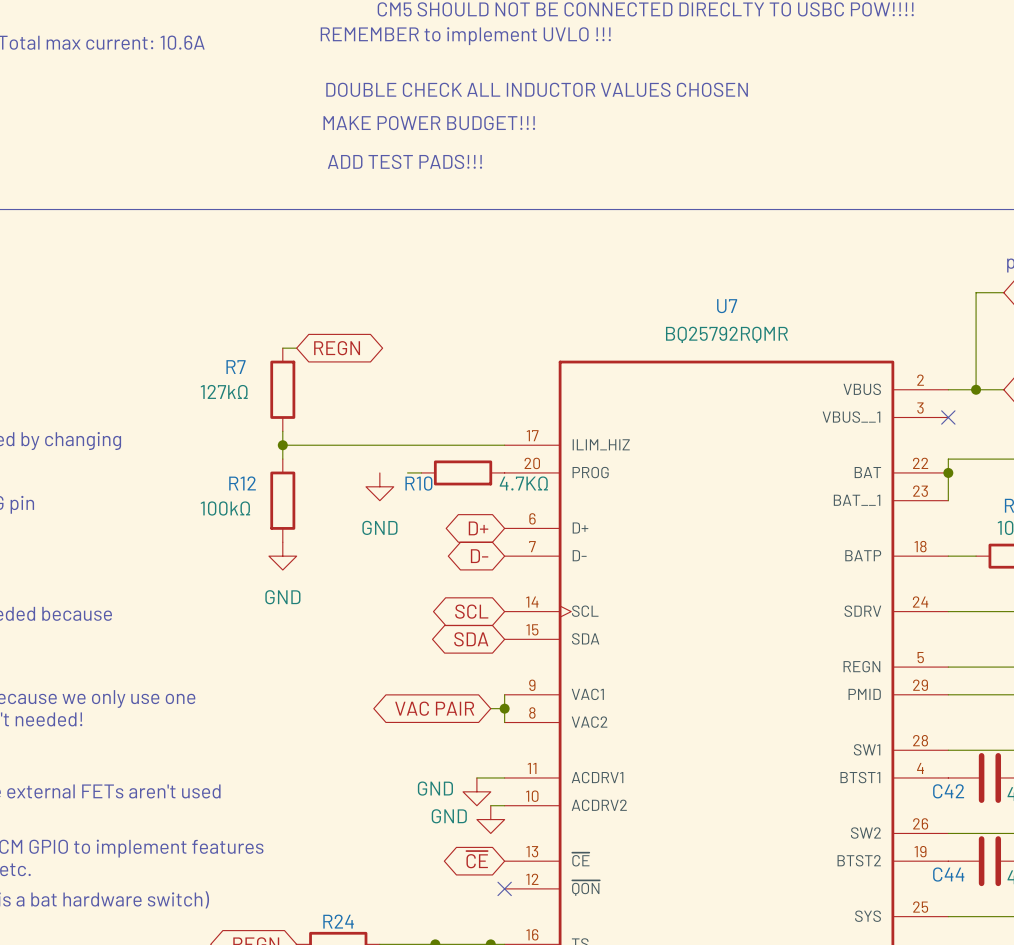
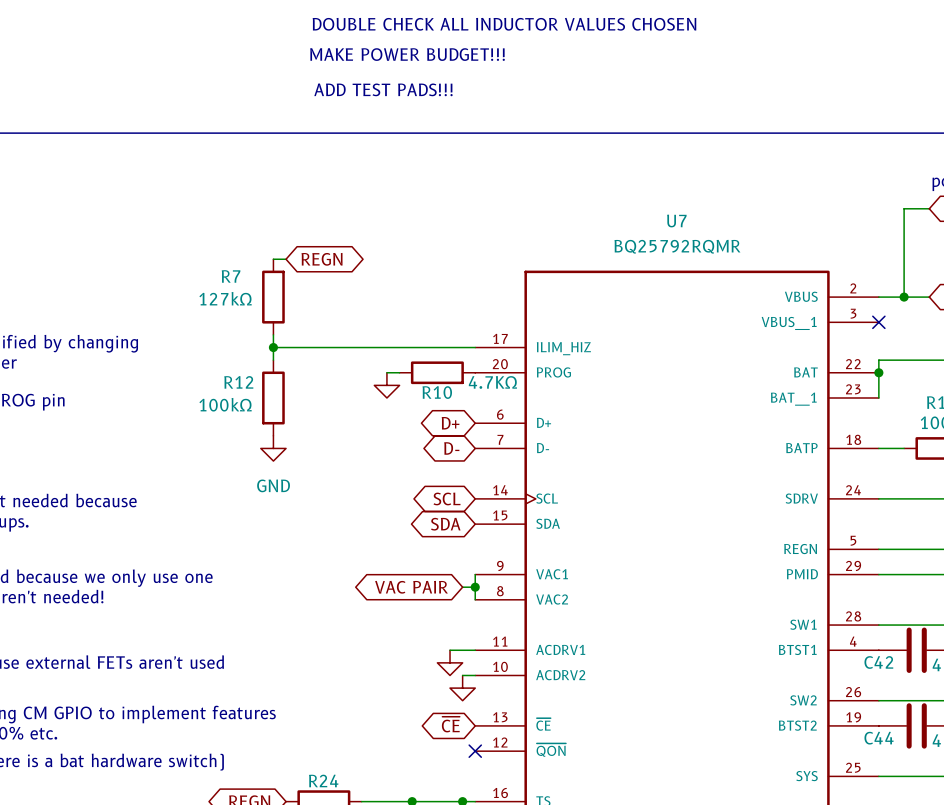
R10 name position: R10 (418, 483) -> R10 (437, 392)
power symbol: GND (379, 486) -> none
power symbol: none -> (386, 385)
power symbol text: GND (435, 788) -> none
power symbol text: GND (449, 816) -> none

